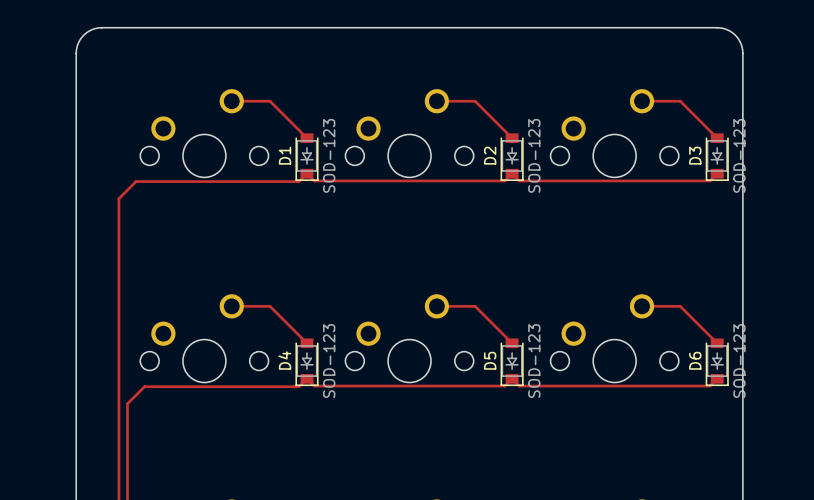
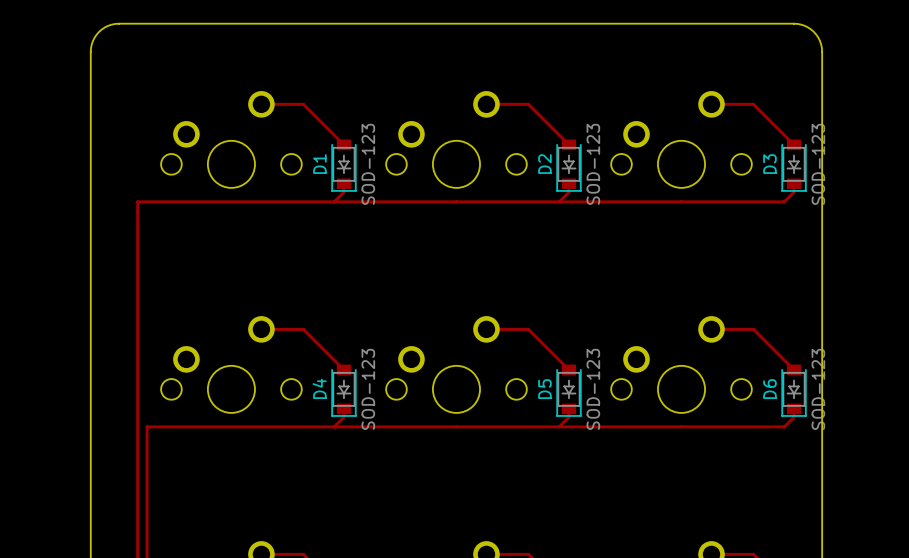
track: none -> (343, 183) (343, 192) (334, 201)
track: (717, 173) (710, 180) (519, 180) (512, 173) (504, 180) (314, 180) (306, 173) (299, 181) (136, 181) (118, 198) -> (568, 183) (568, 192) (559, 201) (137, 201) (137, 211)
track: none -> (794, 183) (794, 192) (784, 201) (559, 201)
track: none -> (343, 408) (343, 417) (334, 426)
track: (717, 378) (710, 386) (519, 386) (512, 378) (504, 386) (314, 386) (306, 378) (299, 386) (144, 386) (127, 403) -> (568, 408) (568, 417) (559, 426) (147, 426) (147, 436)
track: none -> (794, 408) (794, 417) (784, 426) (559, 426)

